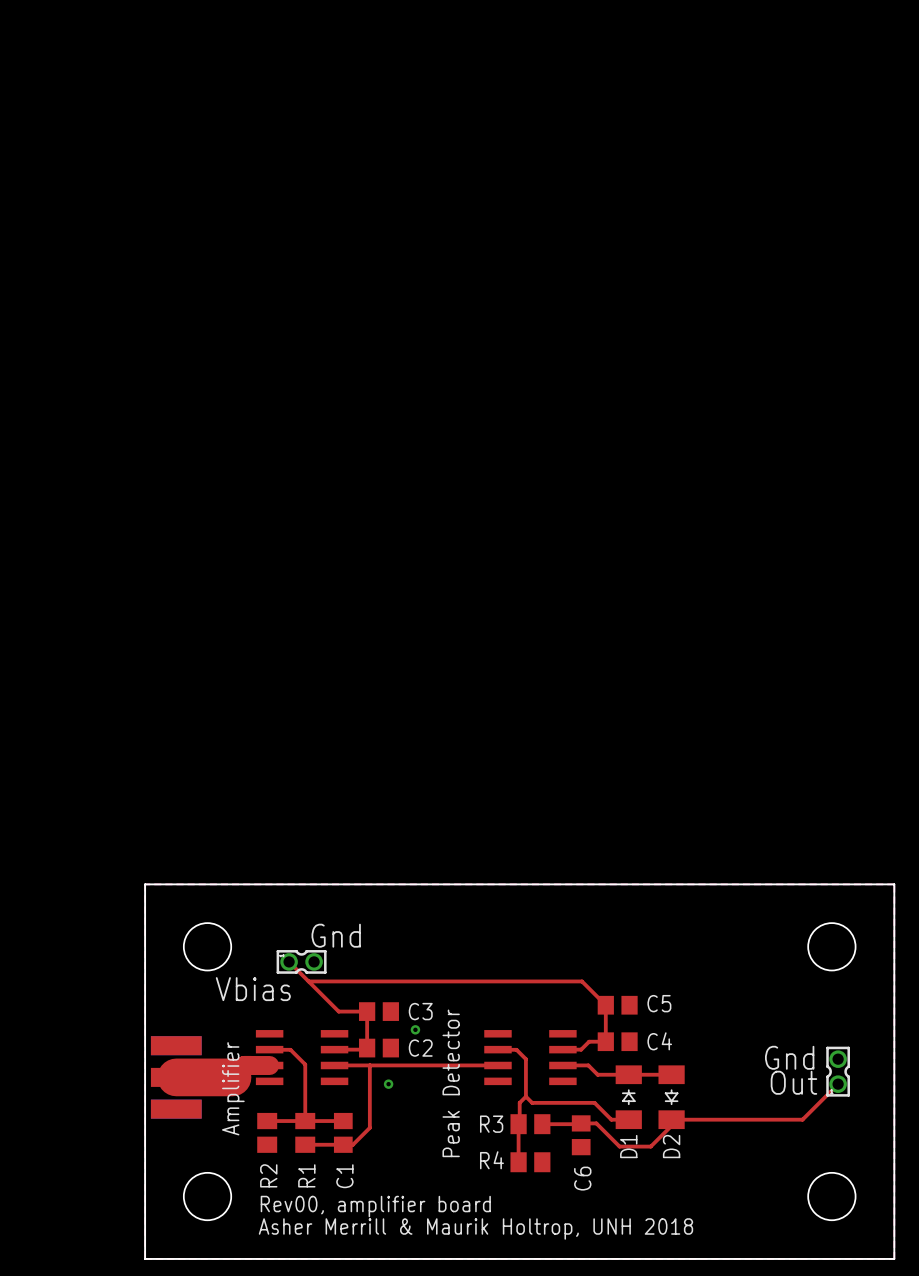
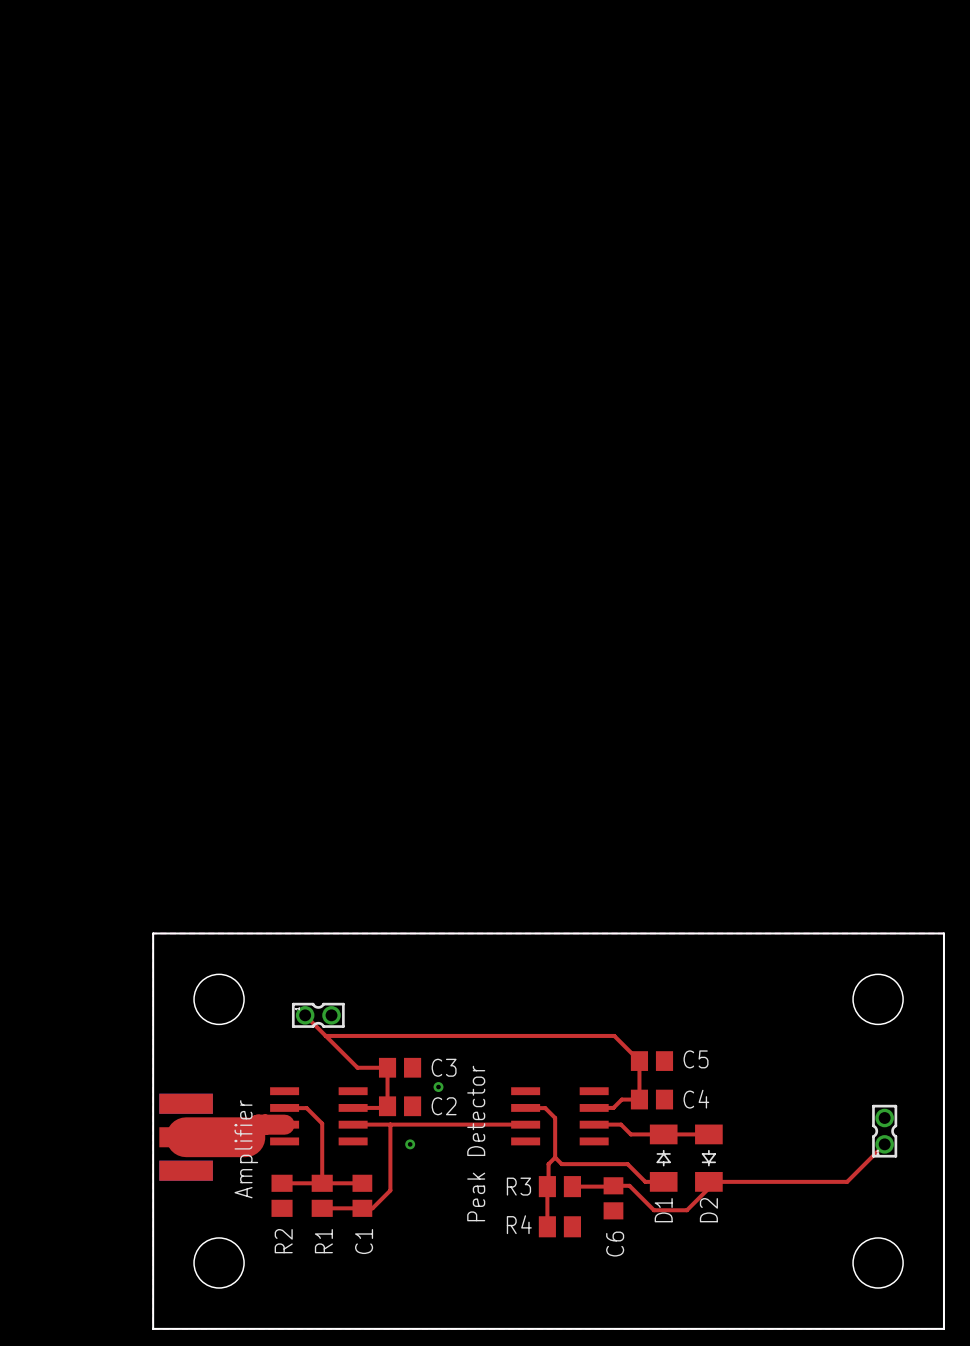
text: Gnd (336, 935) -> none
text: Vbias (253, 989) -> none
text: Gnd (789, 1057) -> none
text: Out (793, 1082) -> none
text: Rev00, amplifier board (375, 1206) -> none
text: Asher Merrill & Maurik Holtrop, UNH 2018 (475, 1229) -> none

